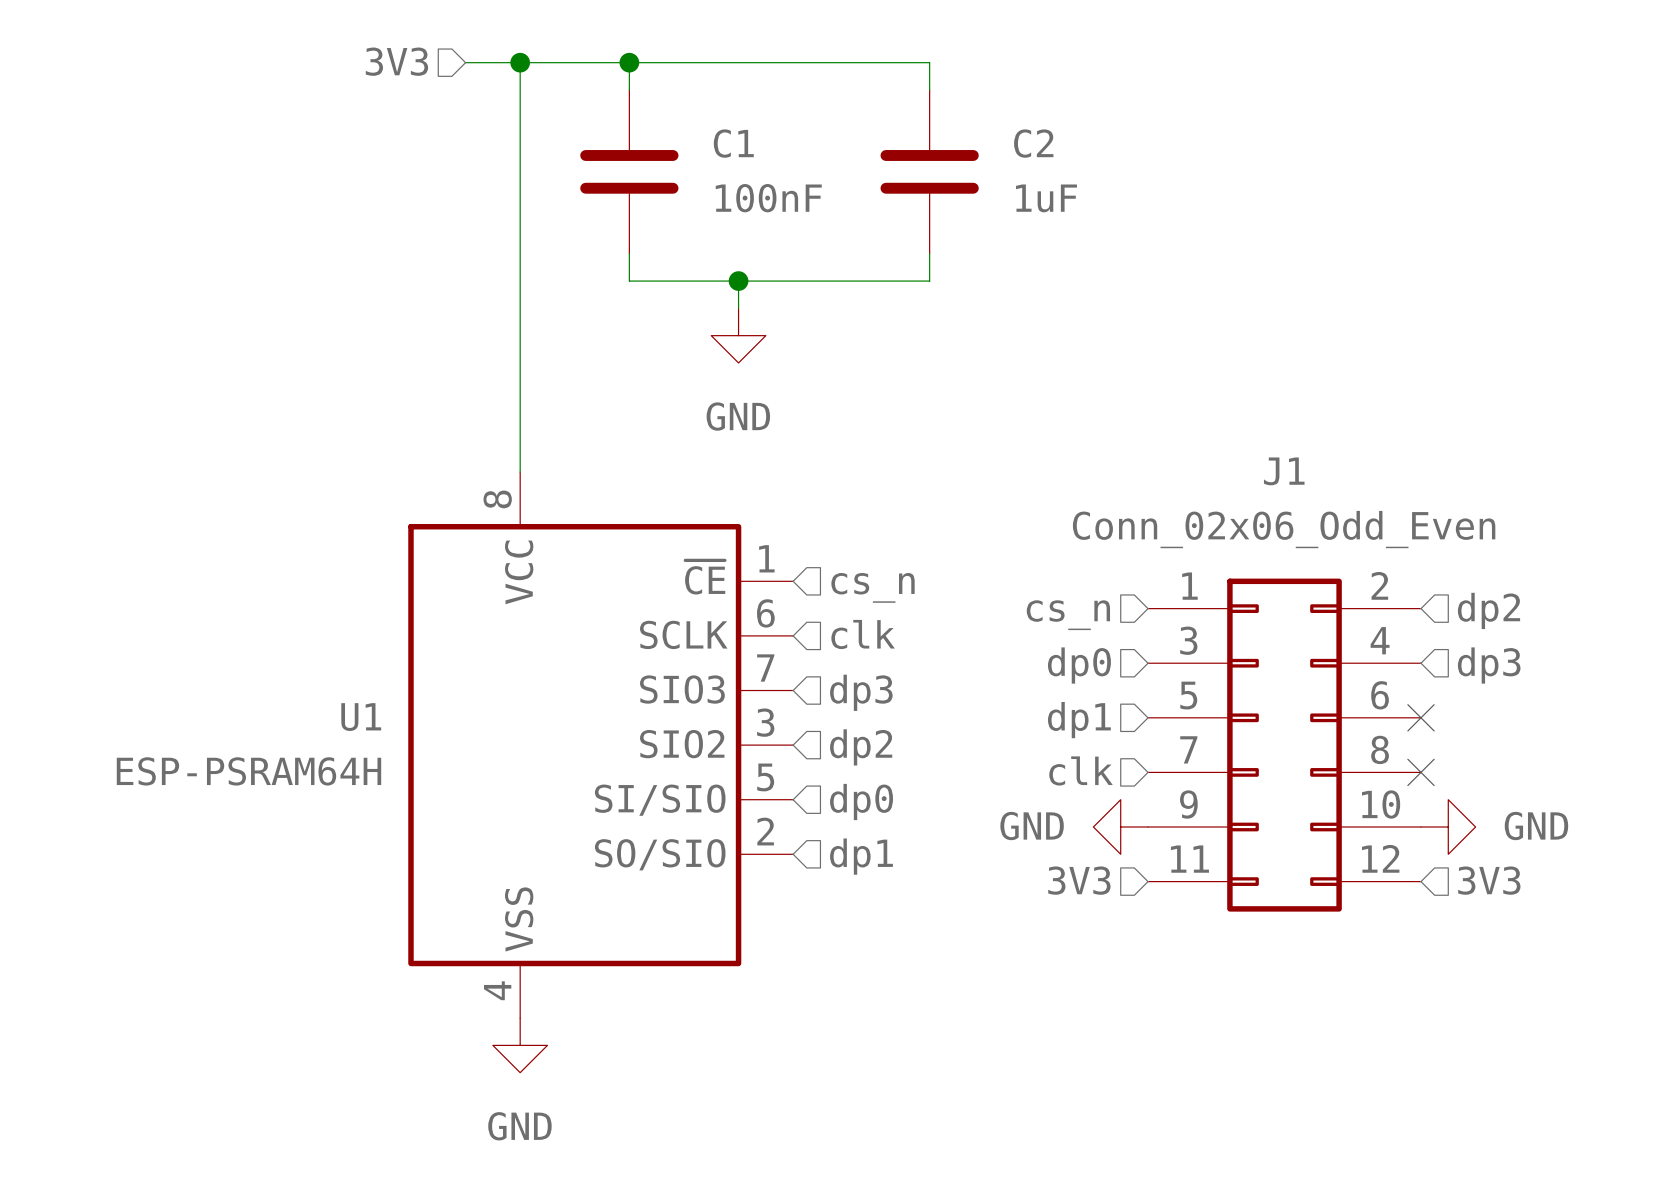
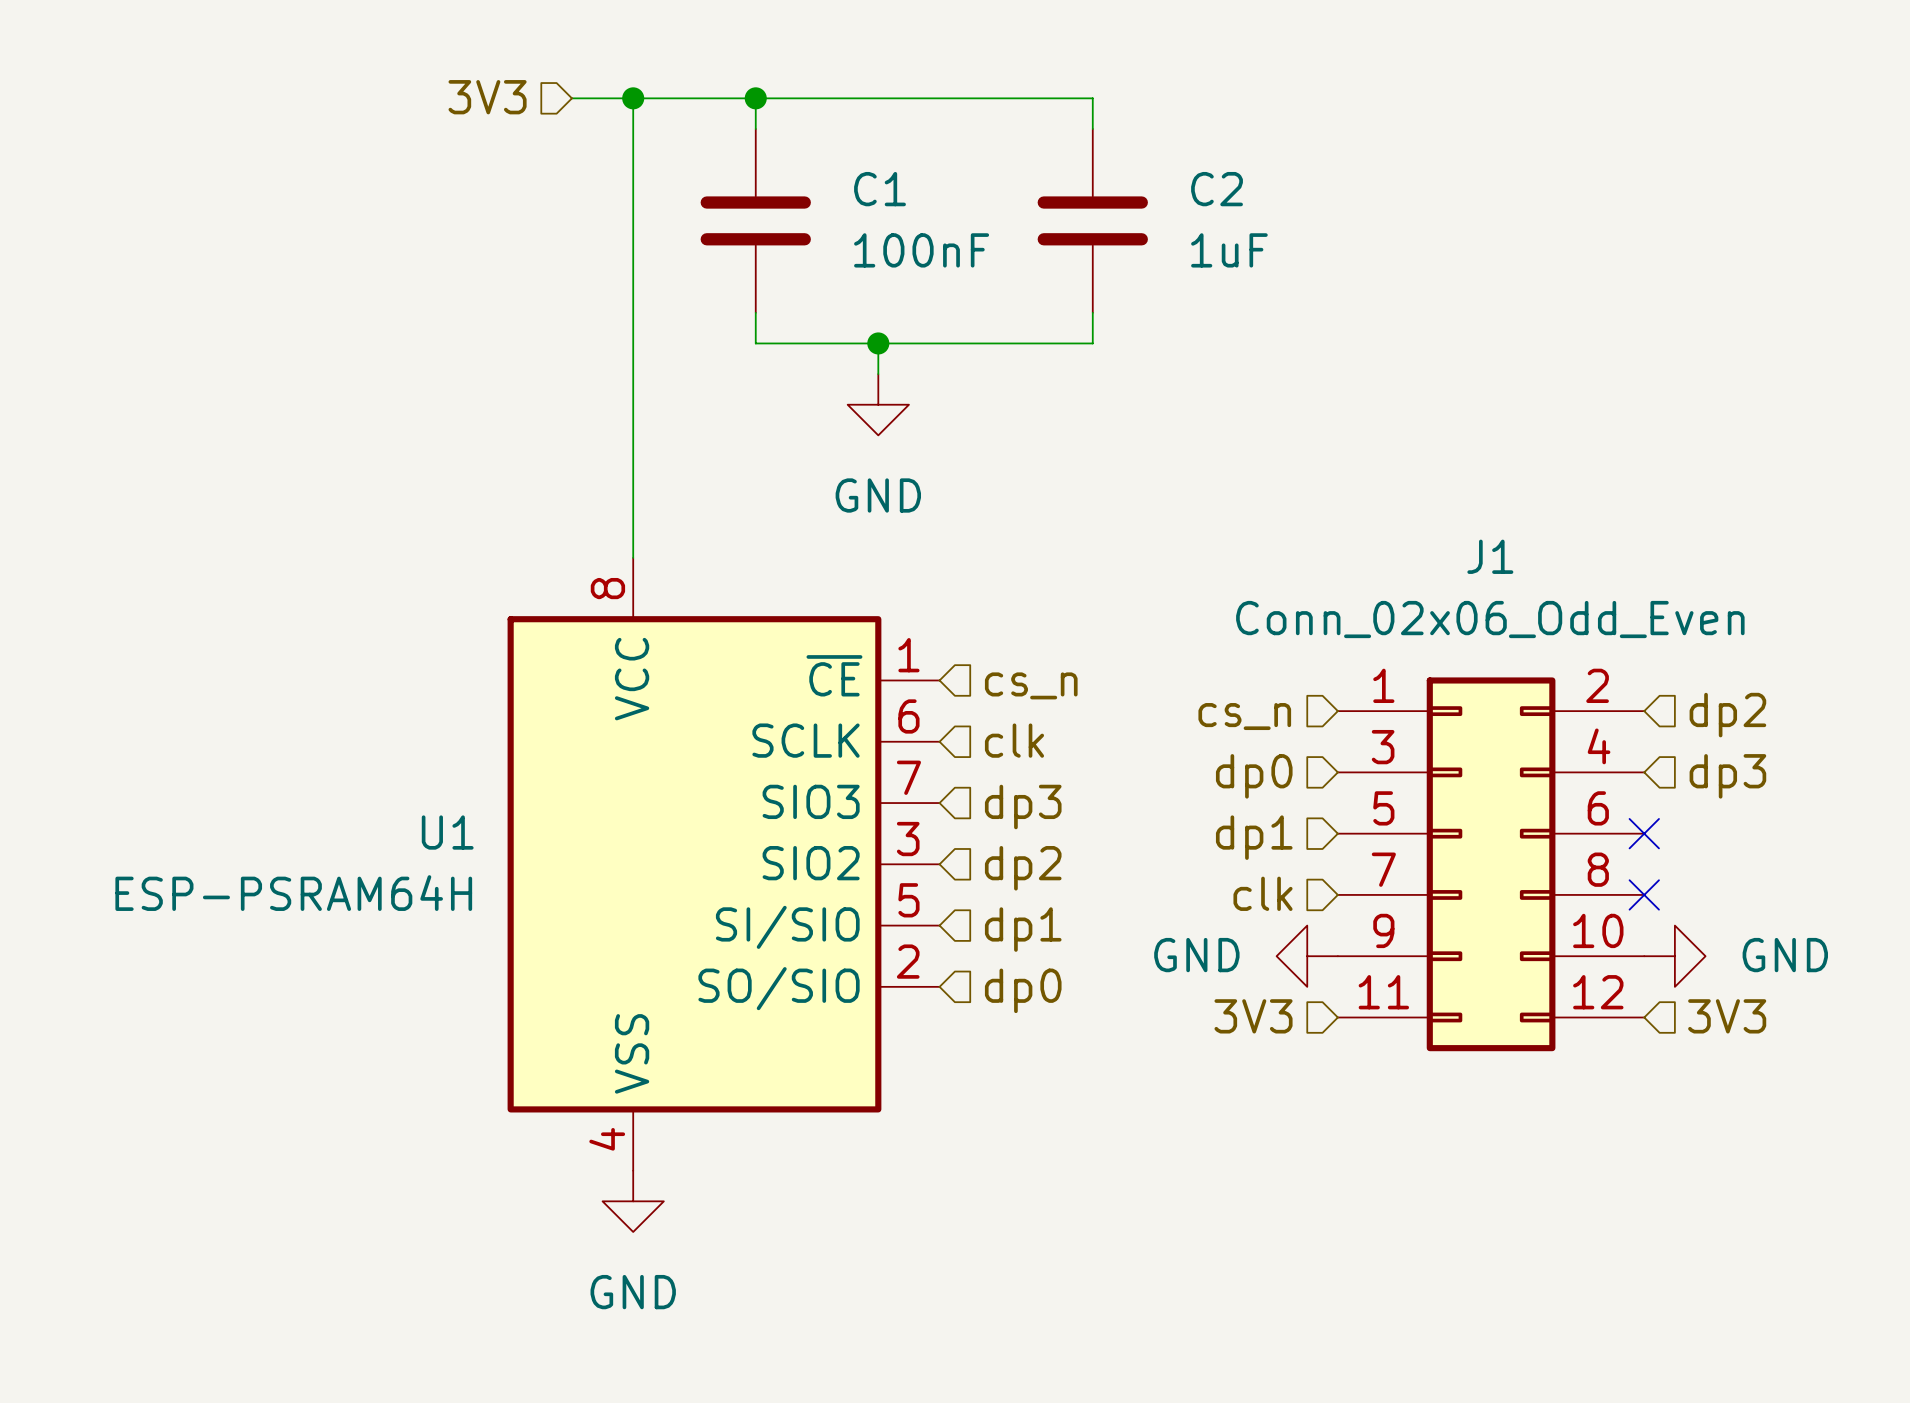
hierarchical label: dp0 (861, 802) -> dp1 (1023, 929)
hierarchical label: dp1 (861, 856) -> dp0 (1023, 990)

